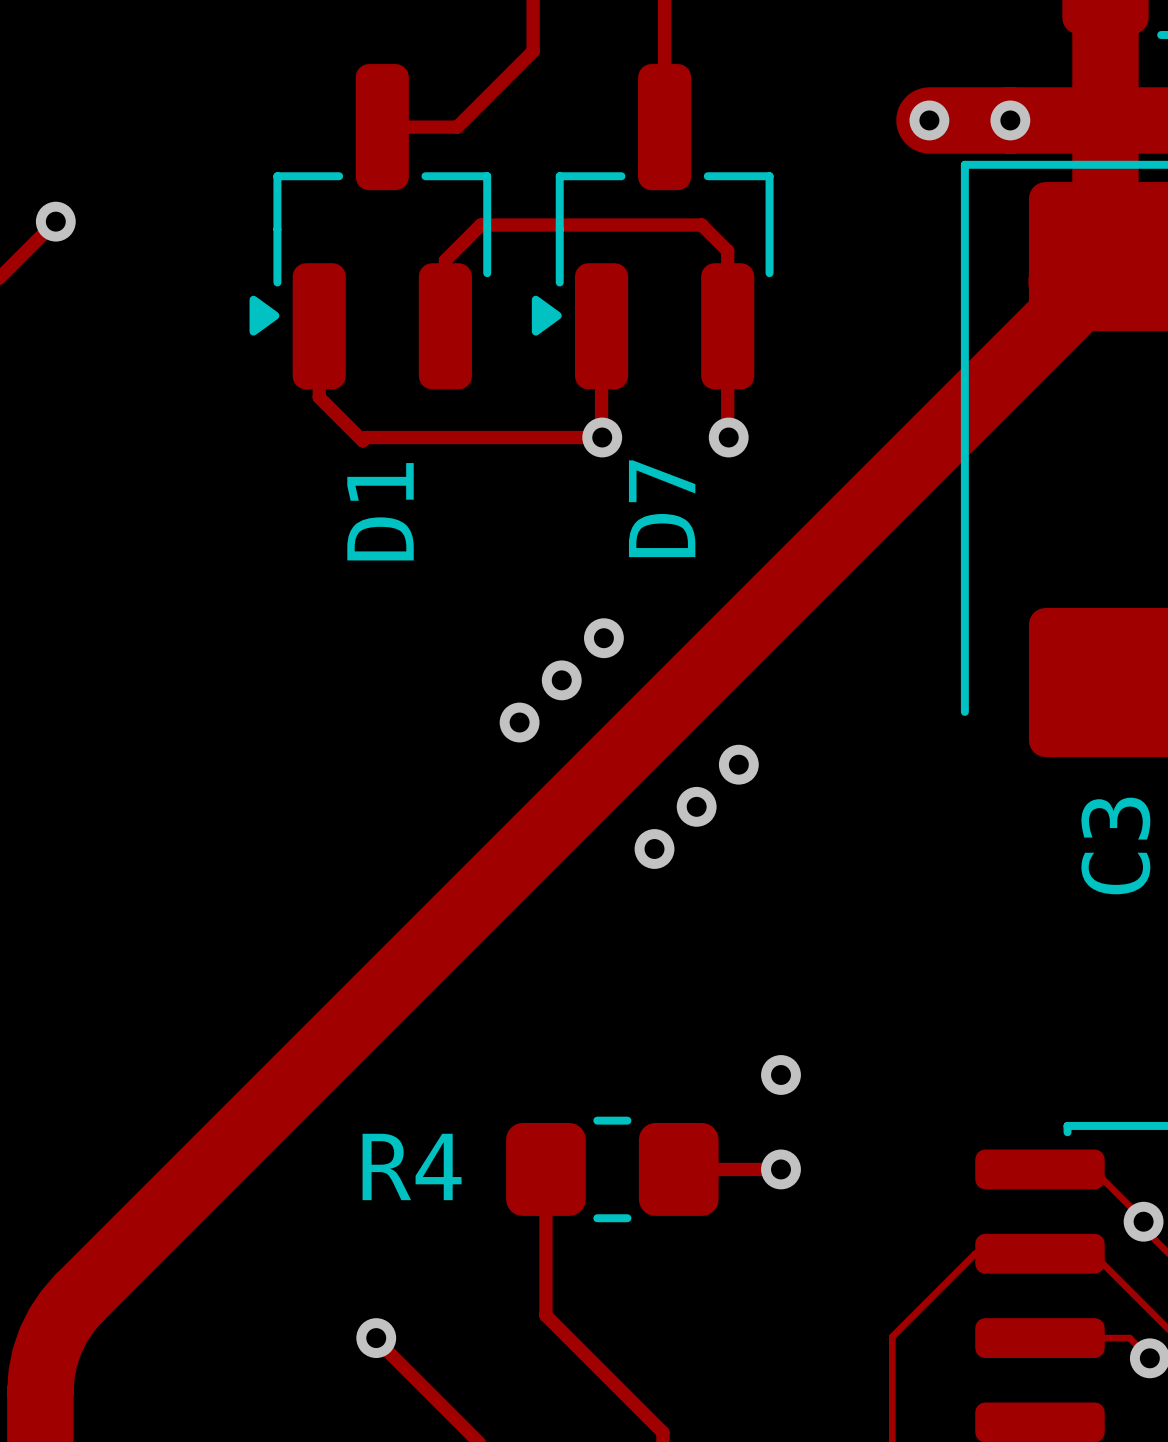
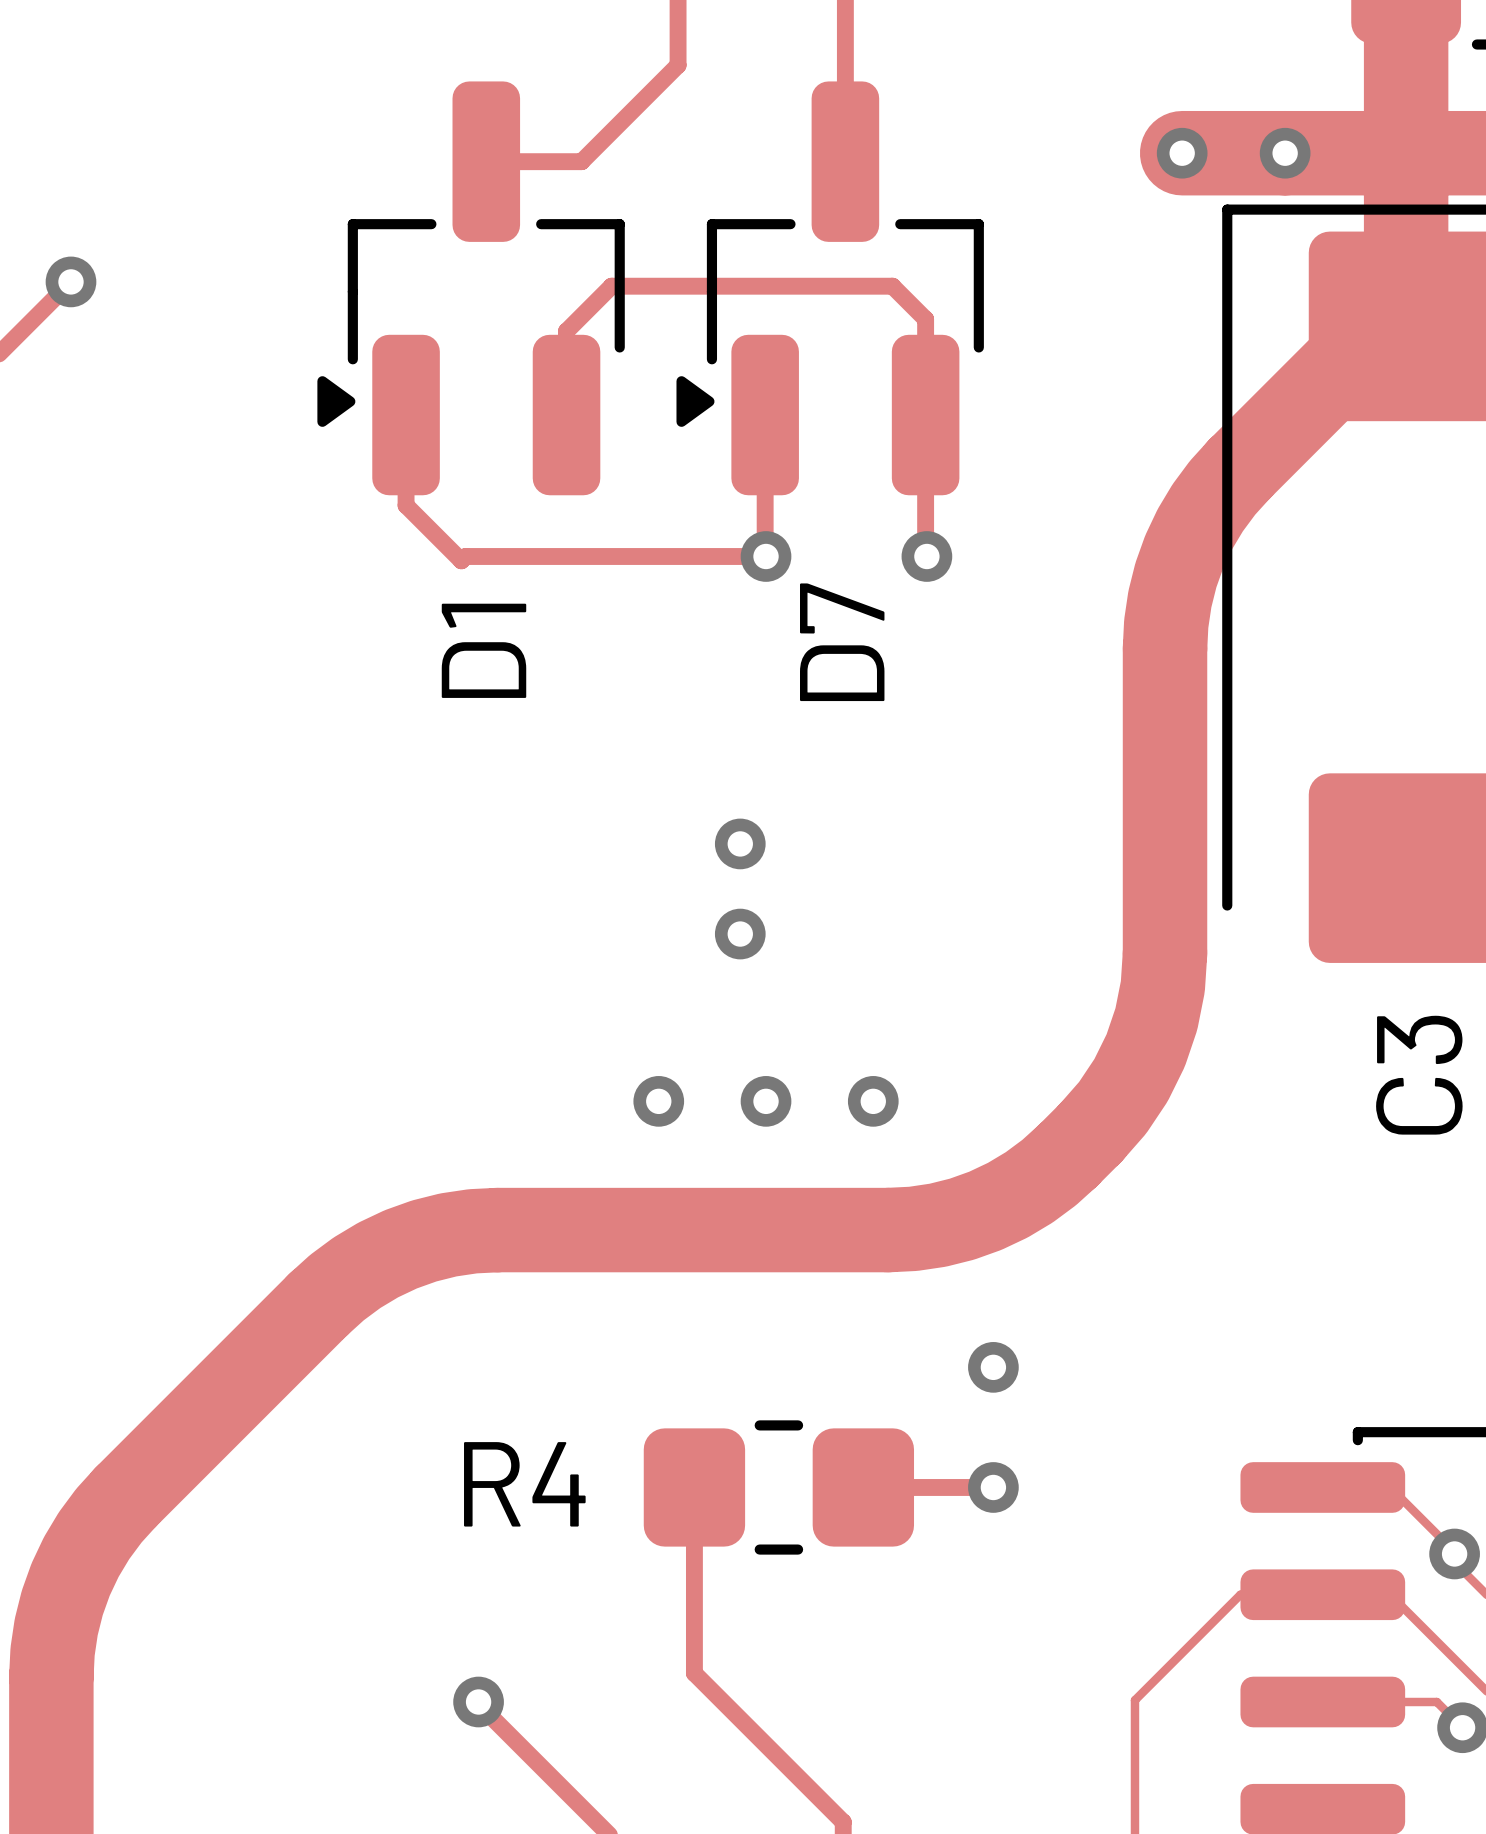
track: (1114, 256) (1114, 262) (79, 1297) (58, 1325) (50, 1340) (44, 1357) (40, 1391) -> (1350, 358) (1222, 487) (1194, 529) (1175, 575) (1166, 623) (1165, 648) (1165, 953) (1162, 986) (1156, 1019) (1145, 1050) (1131, 1080) (1112, 1107) (1090, 1132) (1049, 1172) (1029, 1187) (985, 1210) (937, 1225) (888, 1230) (472, 1231) (424, 1240) (400, 1249) (356, 1272) (318, 1304) (125, 1497) (94, 1535) (70, 1579) (56, 1626) (51, 1676) (51, 1770)
via: (603, 638) -> none
via: none -> (740, 843)
via: (561, 680) -> none
via: (519, 722) -> none
via: none -> (740, 934)
via: (738, 764) -> none
via: (696, 806) -> none
via position: (654, 849) -> (873, 1101)
via: none -> (658, 1101)
via: none -> (766, 1101)

